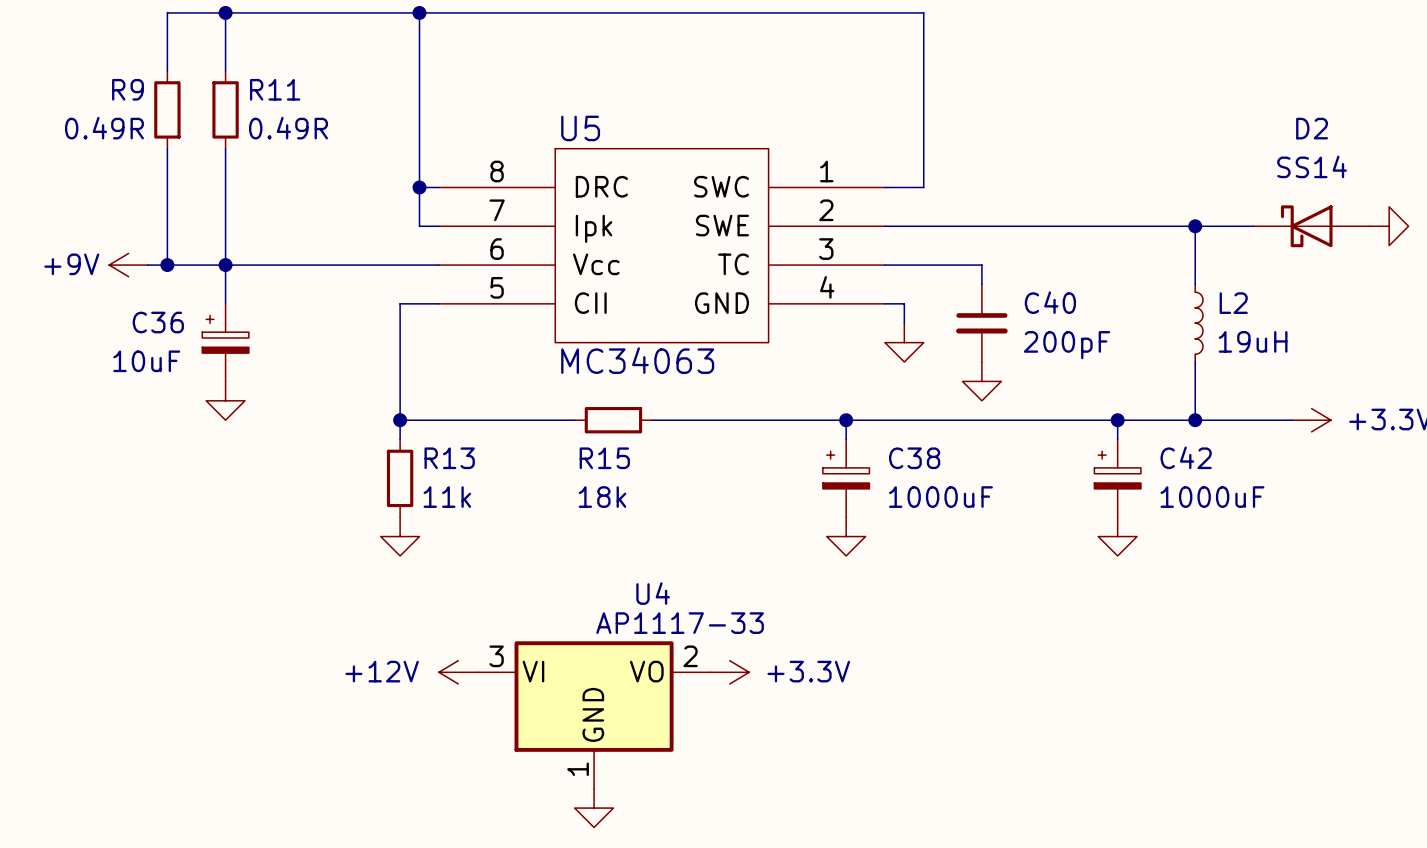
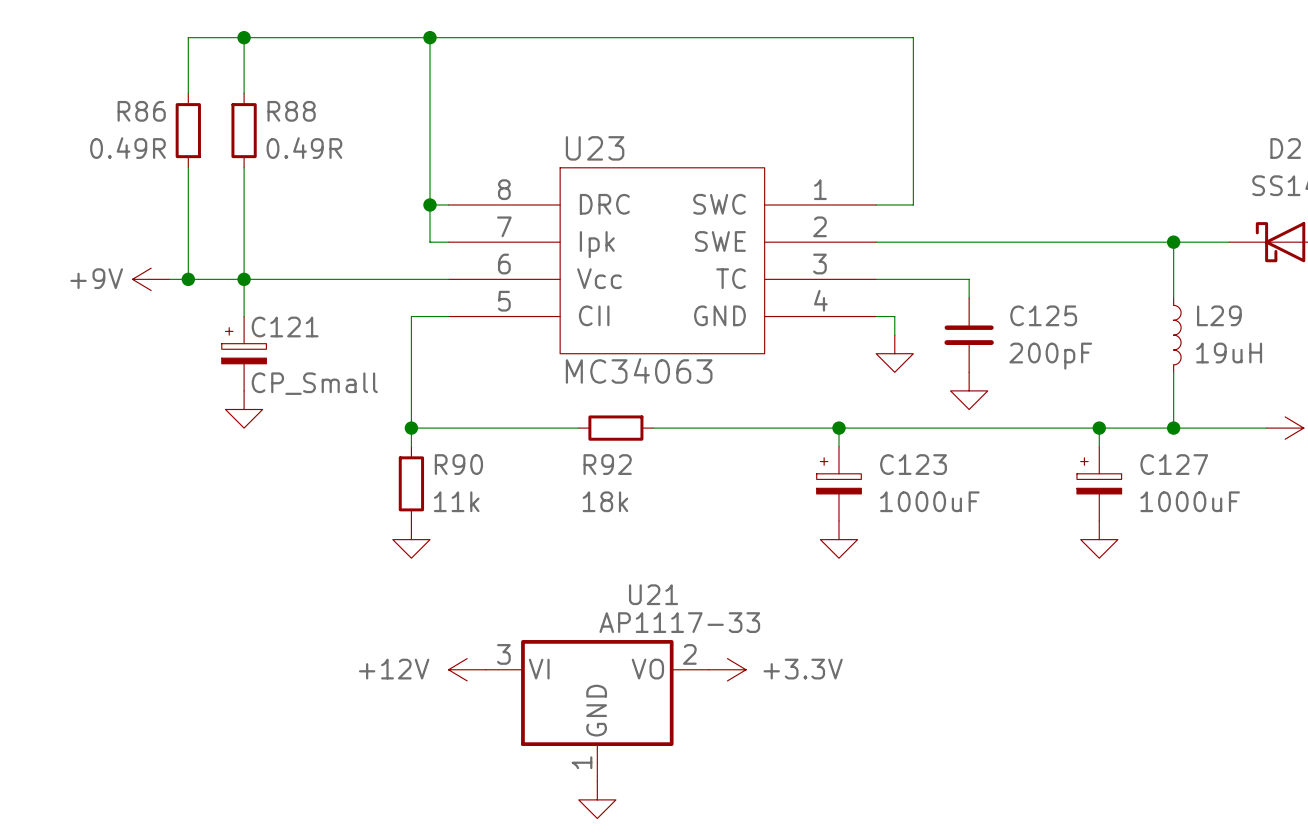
R9 name: R9 (128, 89) -> R86 (141, 111)
R11 name: R11 (275, 89) -> R88 (291, 111)
U5 name: U5 (580, 128) -> U23 (595, 148)
C40 name: C40 (1050, 302) -> C125 (1043, 315)
L2 name: L2 (1233, 303) -> L29 (1219, 315)
C36 name: C36 (158, 322) -> C121 (285, 327)
C36 value: 10uF (146, 361) -> CP_Small (314, 383)
C42 name: C42 (1186, 457) -> C127 (1174, 464)
R13 name: R13 (449, 458) -> R90 (458, 464)
R15 name: R15 (604, 458) -> R92 (607, 464)
C38 name: C38 (914, 458) -> C123 (913, 464)
U4 name: U4 (653, 593) -> U21 (653, 594)

